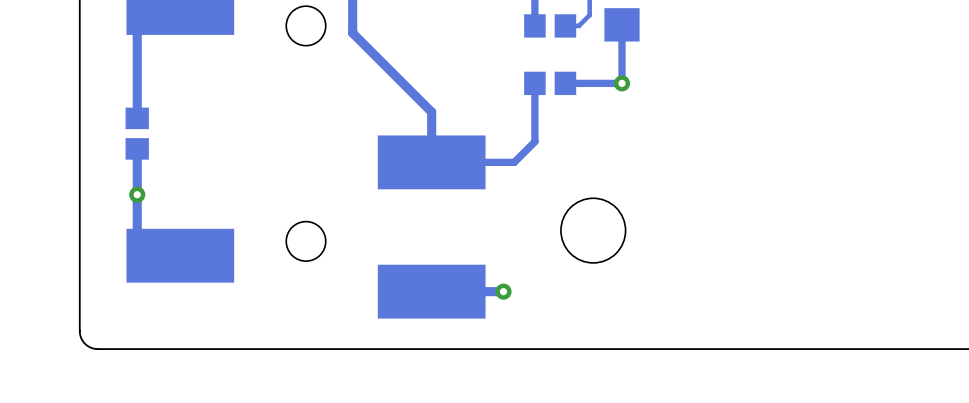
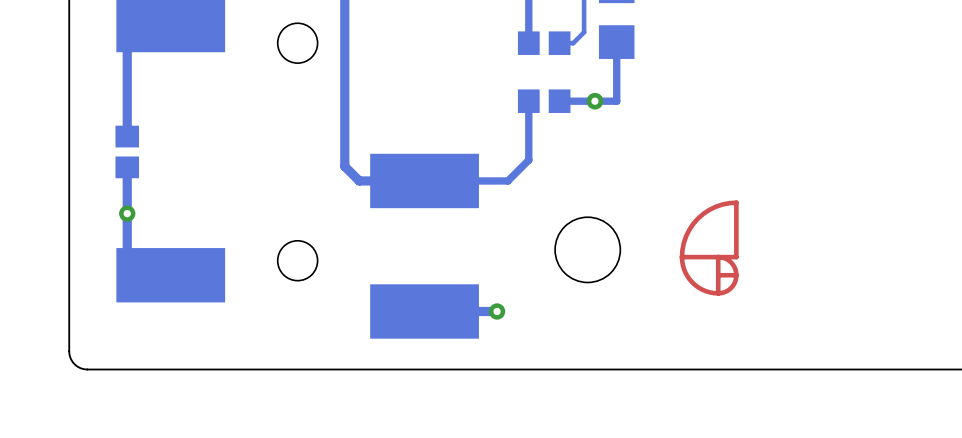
bottom track: (352, 33) (431, 112) (431, 162) -> (344, 50) (344, 166) (359, 180) (424, 180)
via position: (621, 83) -> (594, 101)
top track: none -> (681, 257) (736, 257) (736, 202) (715, 206) (697, 218) (686, 236) (681, 257)
top track: none -> (681, 257) (685, 272) (692, 282) (702, 289) (718, 293)
top track: none -> (718, 275) (736, 275)
top track: none -> (718, 293) (718, 257) (730, 261) (735, 268) (736, 275) (735, 281) (730, 288) (718, 293)

